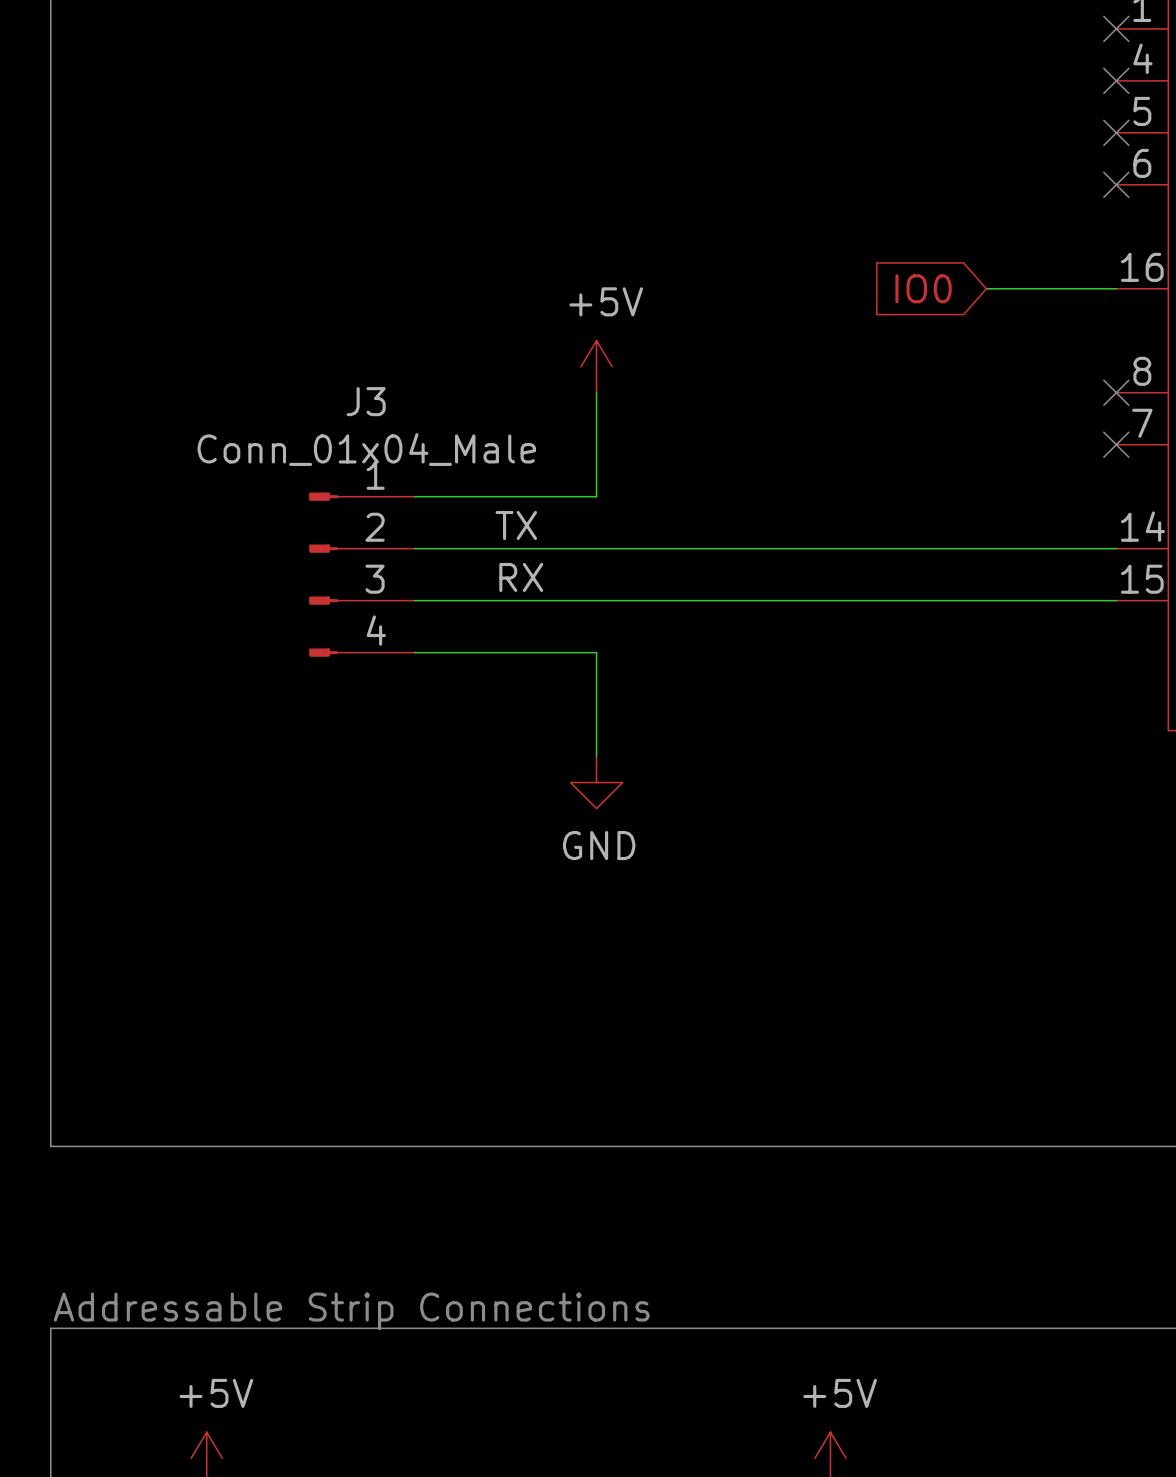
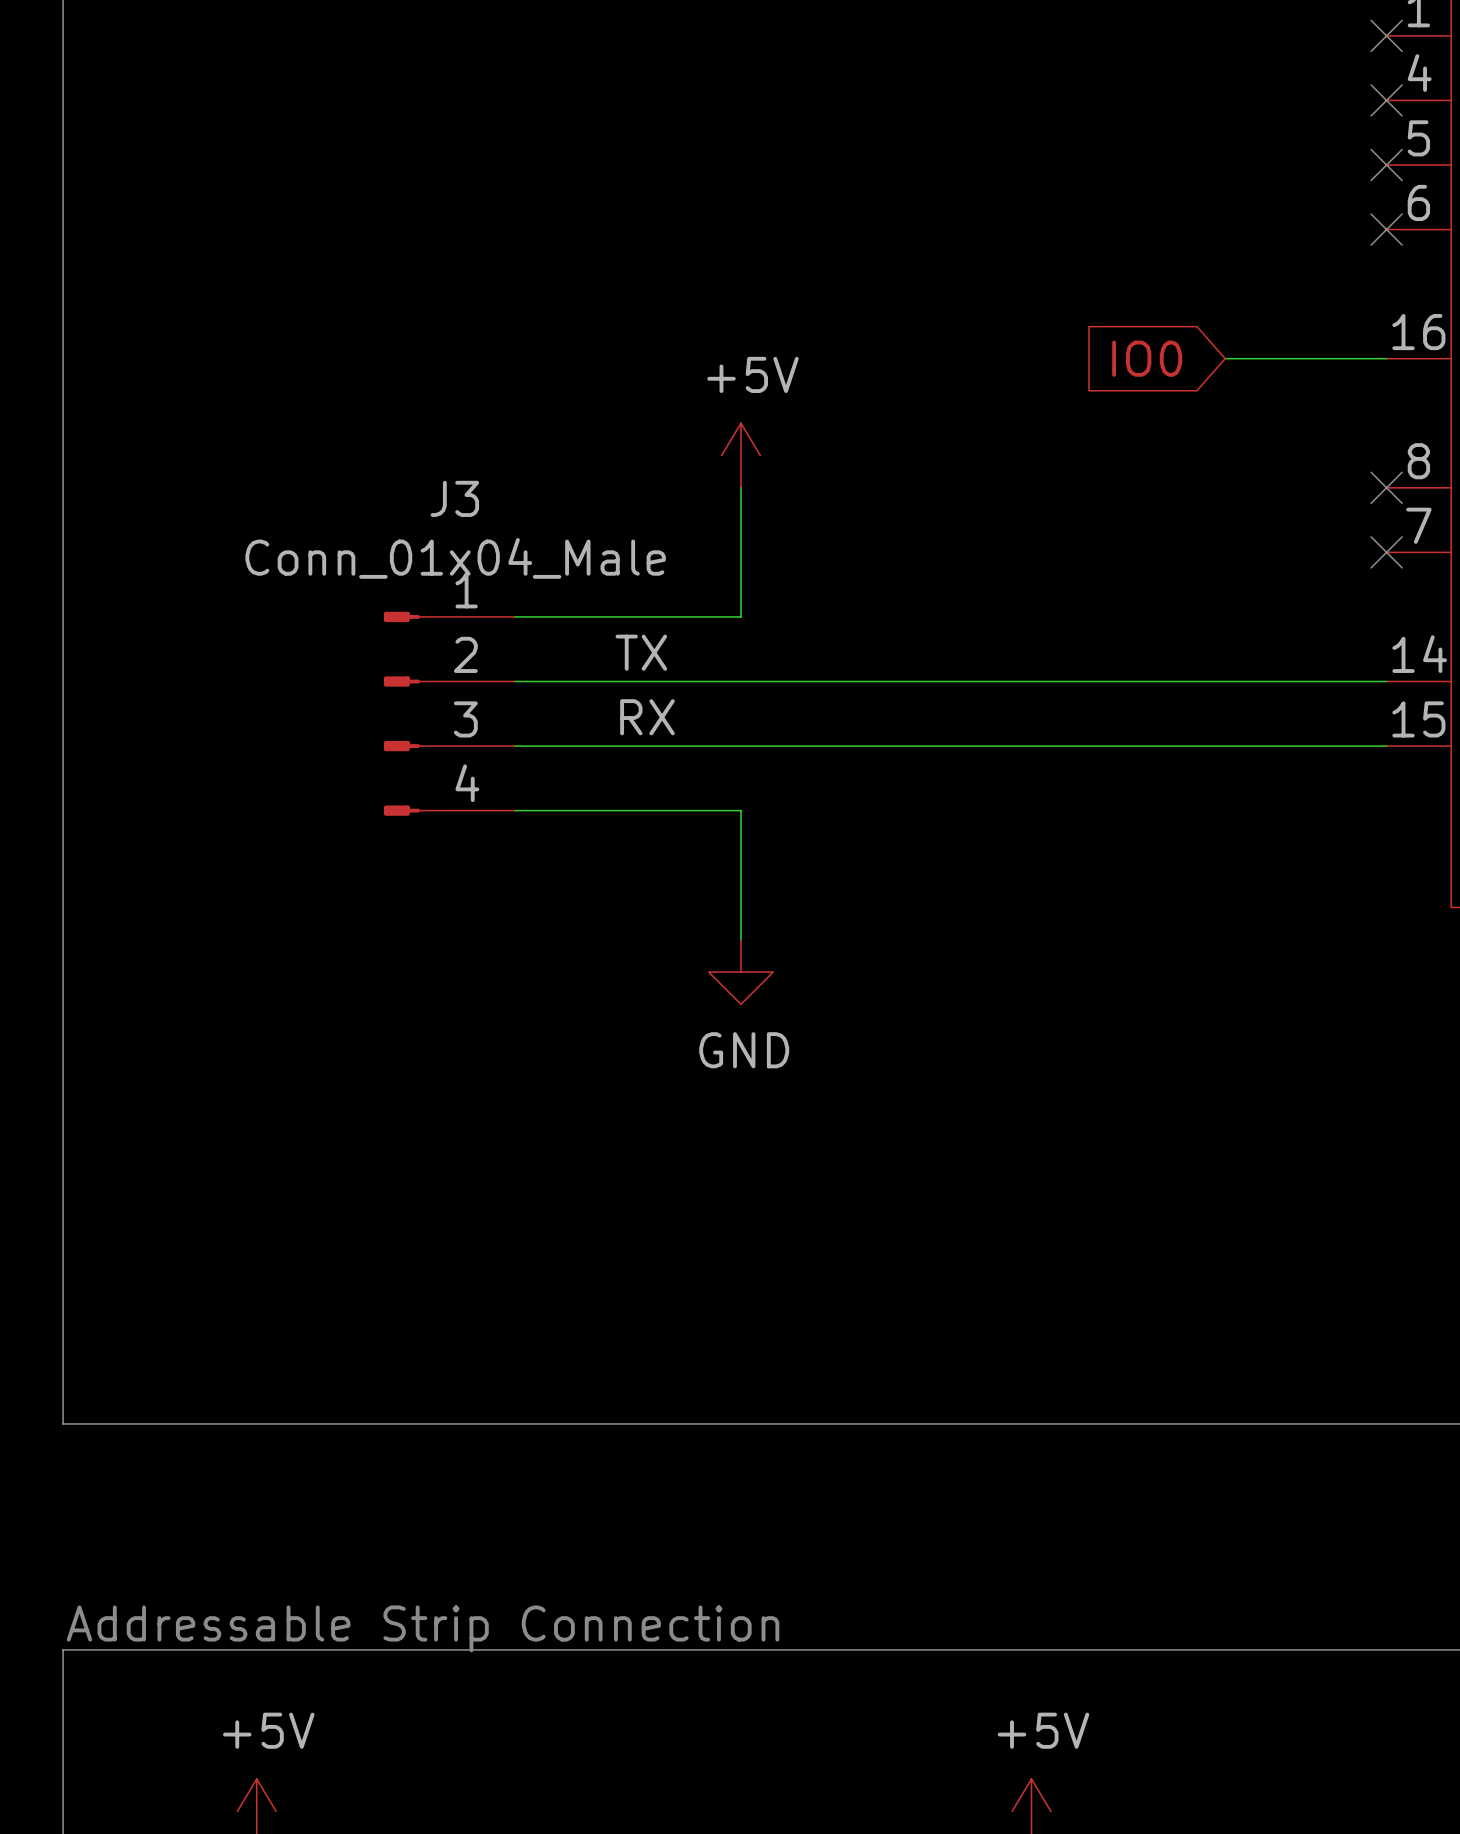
text: Addressable Strip Connections (351, 1311) -> Addressable Strip Connection (423, 1628)

